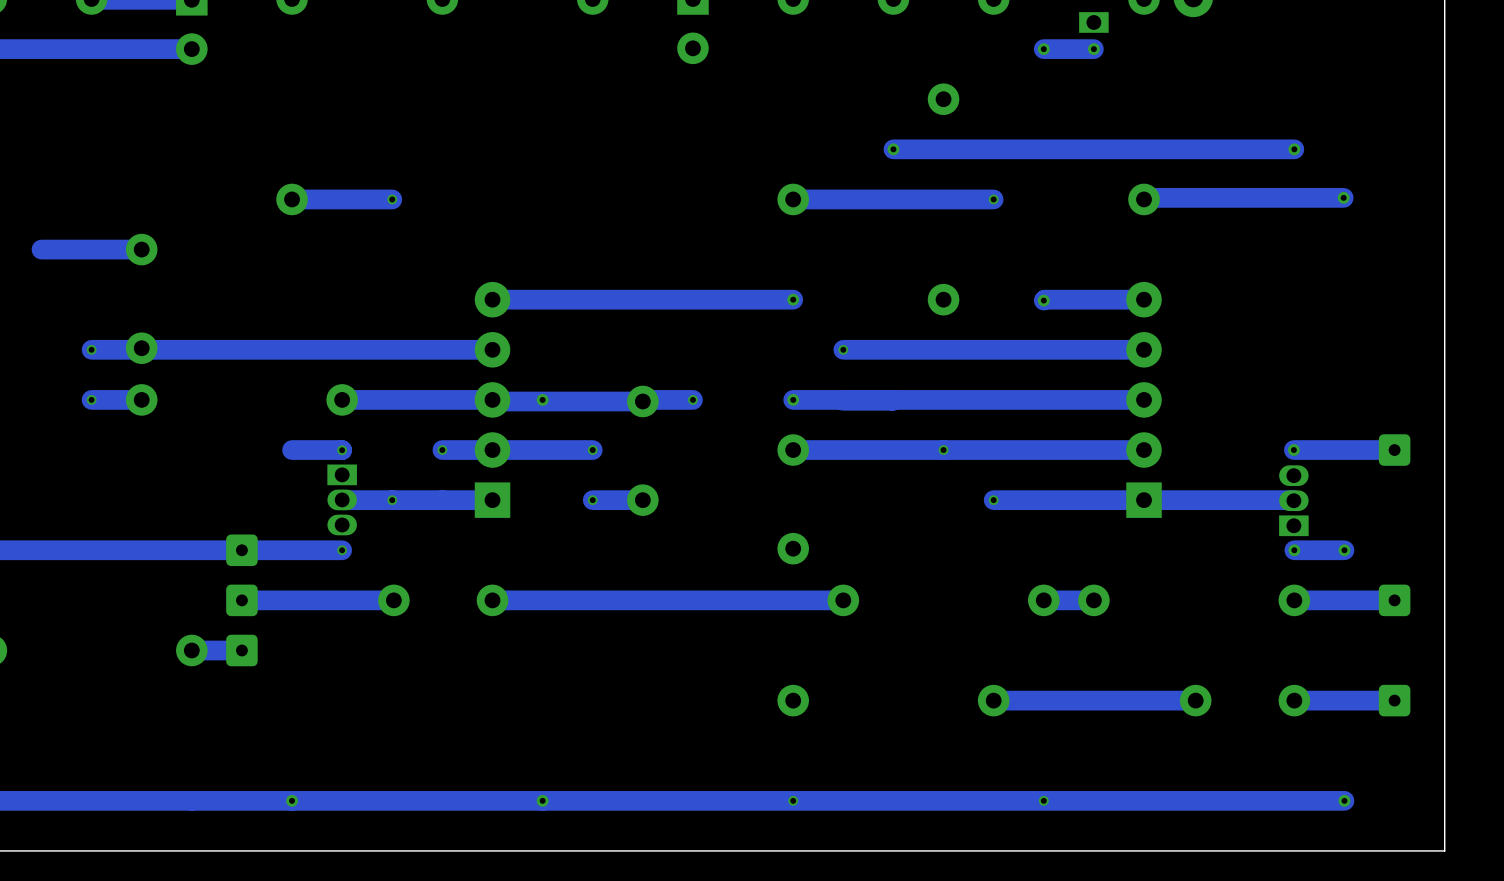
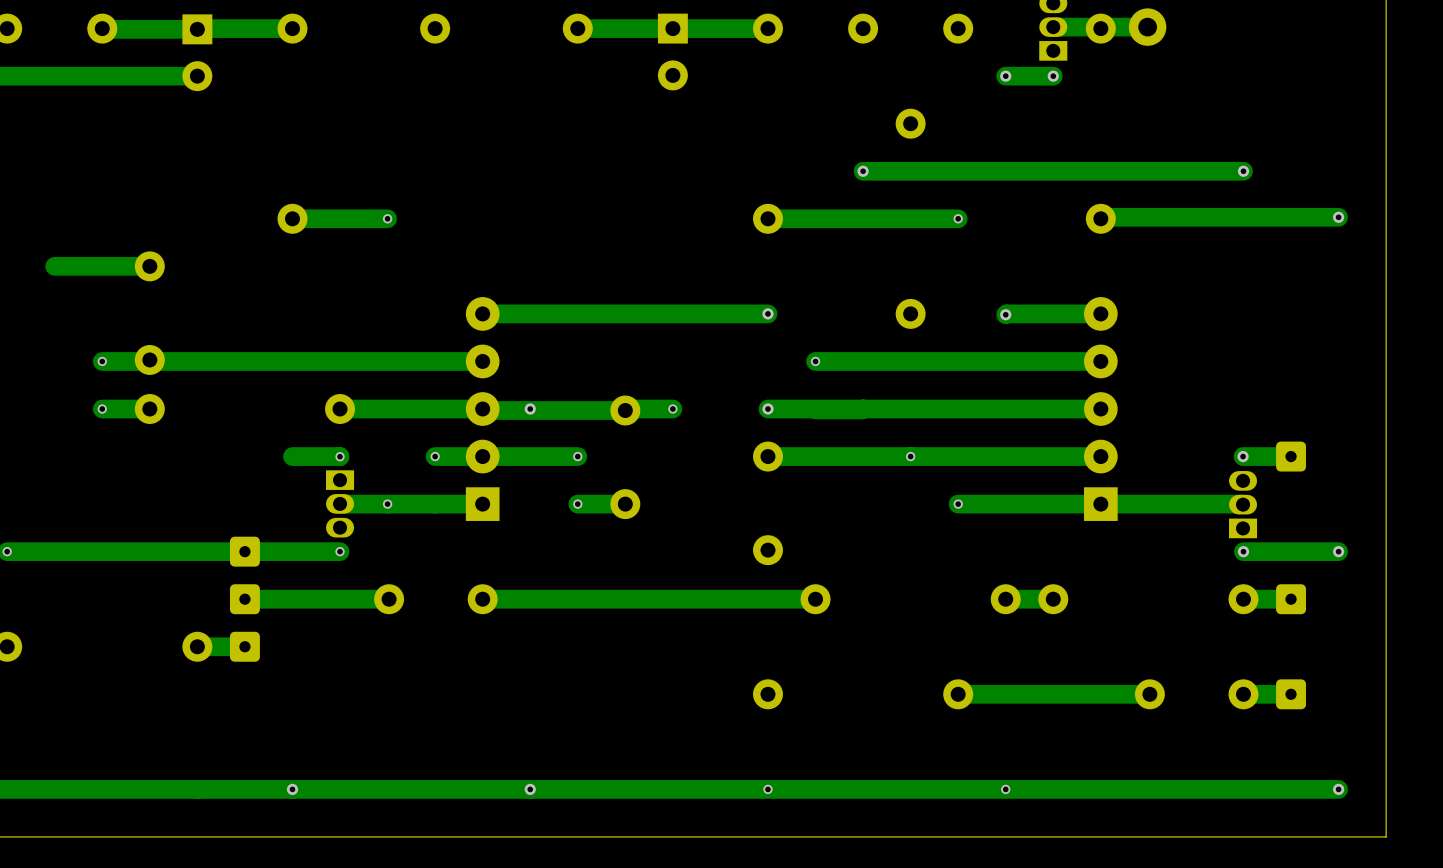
via position: (1343, 197) -> (1338, 217)
track: none -> (1338, 217) (1290, 217)
track: (1394, 450) (1344, 450) -> none
part position: (1394, 450) -> (1291, 456)
via position: (1344, 550) -> (1338, 551)
track: (1394, 600) (1344, 600) -> (1338, 551) (1291, 551)
part position: (1394, 600) -> (1291, 599)
track: (1394, 700) (1344, 700) -> (1338, 789) (1291, 789)
part position: (1394, 700) -> (1291, 694)
via position: (1344, 800) -> (1338, 789)

